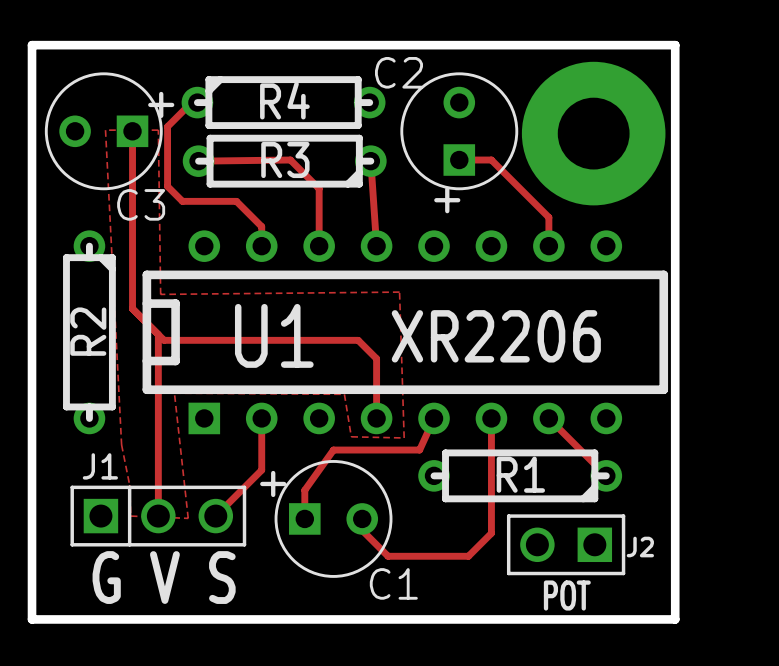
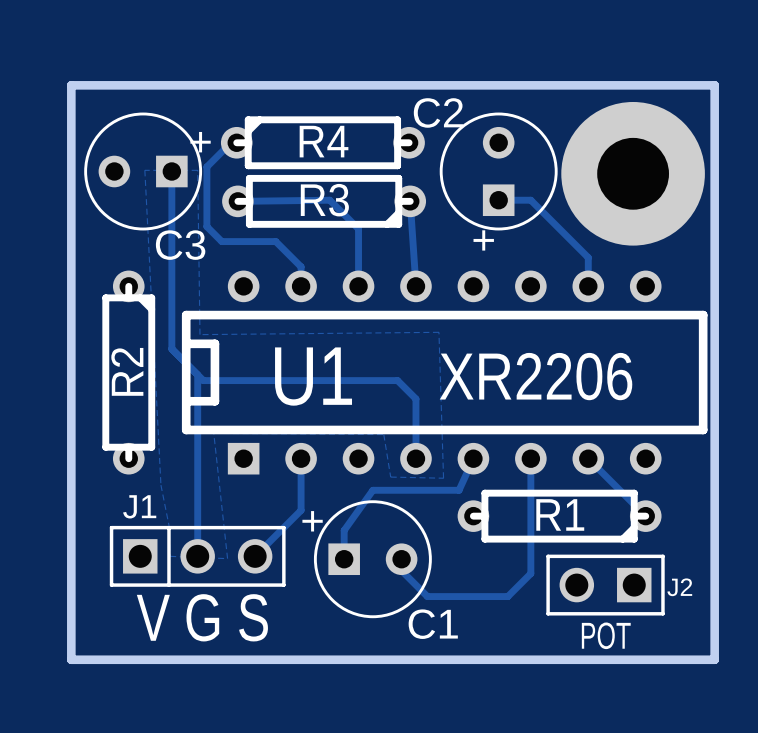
text: G V S (164, 577) -> V G S (202, 617)

